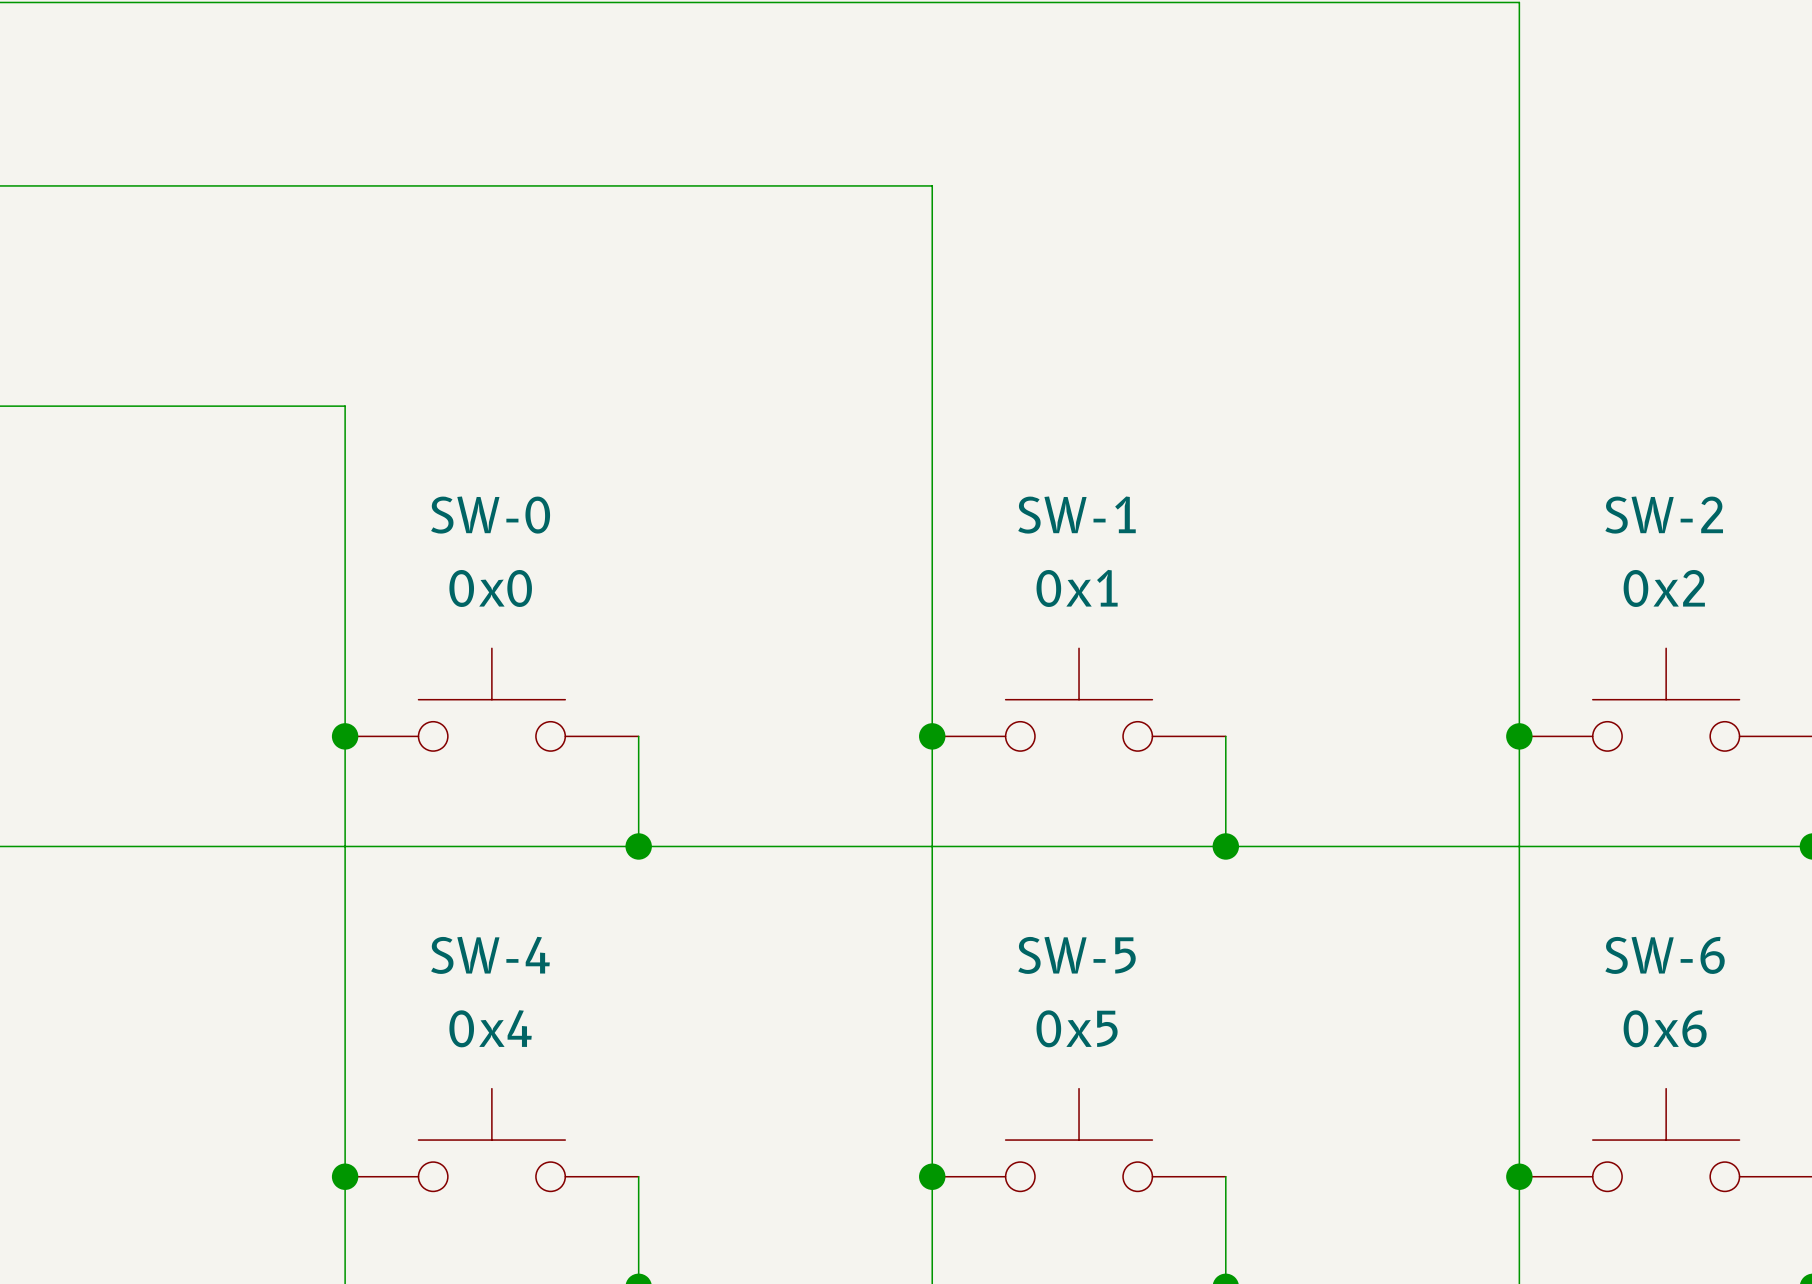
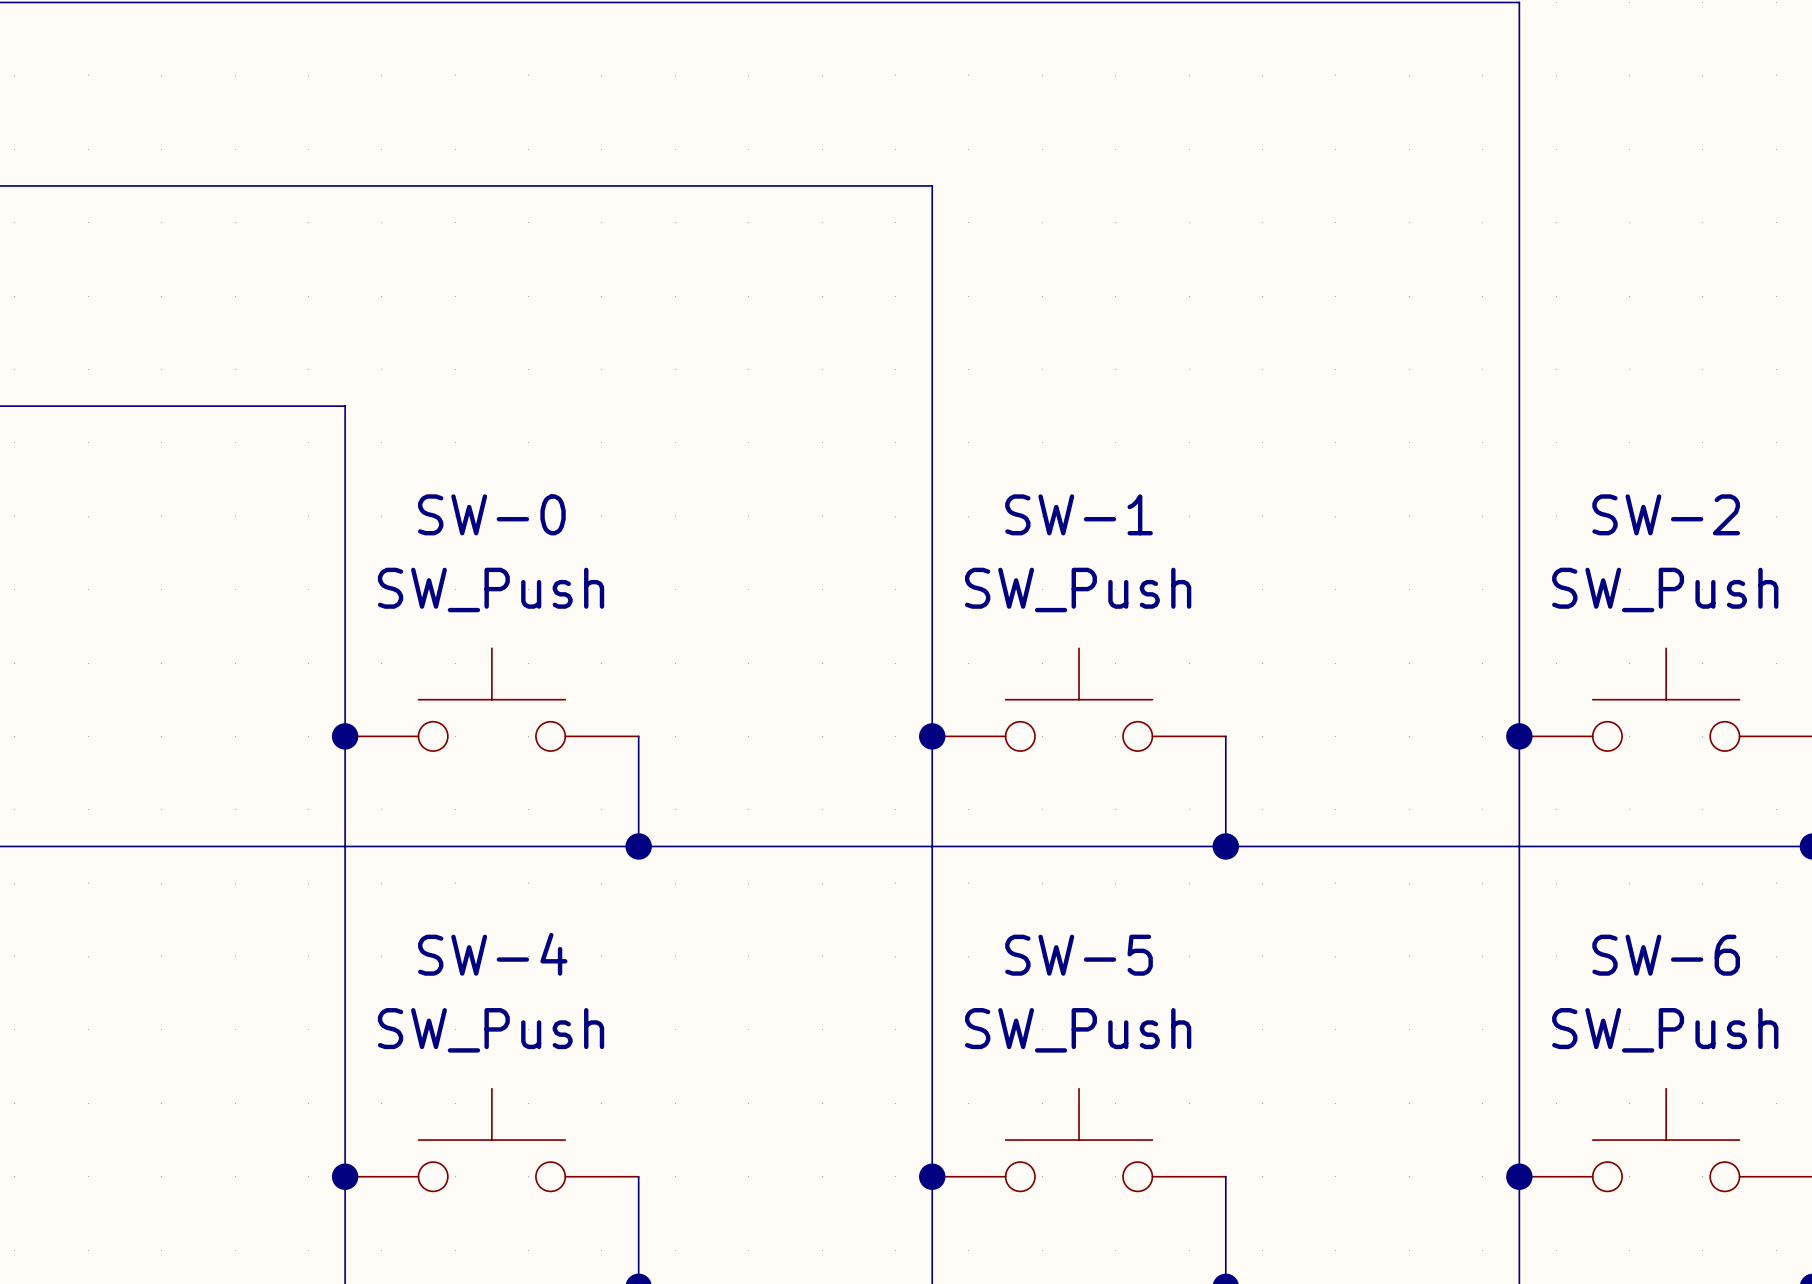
SW-0 value: 0x0 (490, 588) -> SW_Push (491, 589)
SW-1 value: 0x1 (1077, 588) -> SW_Push (1078, 589)
SW-2 value: 0x2 (1664, 588) -> SW_Push (1665, 589)
SW-4 value: 0x4 (490, 1028) -> SW_Push (491, 1030)
SW-5 value: 0x5 (1077, 1028) -> SW_Push (1078, 1030)
SW-6 value: 0x6 (1665, 1028) -> SW_Push (1665, 1030)

